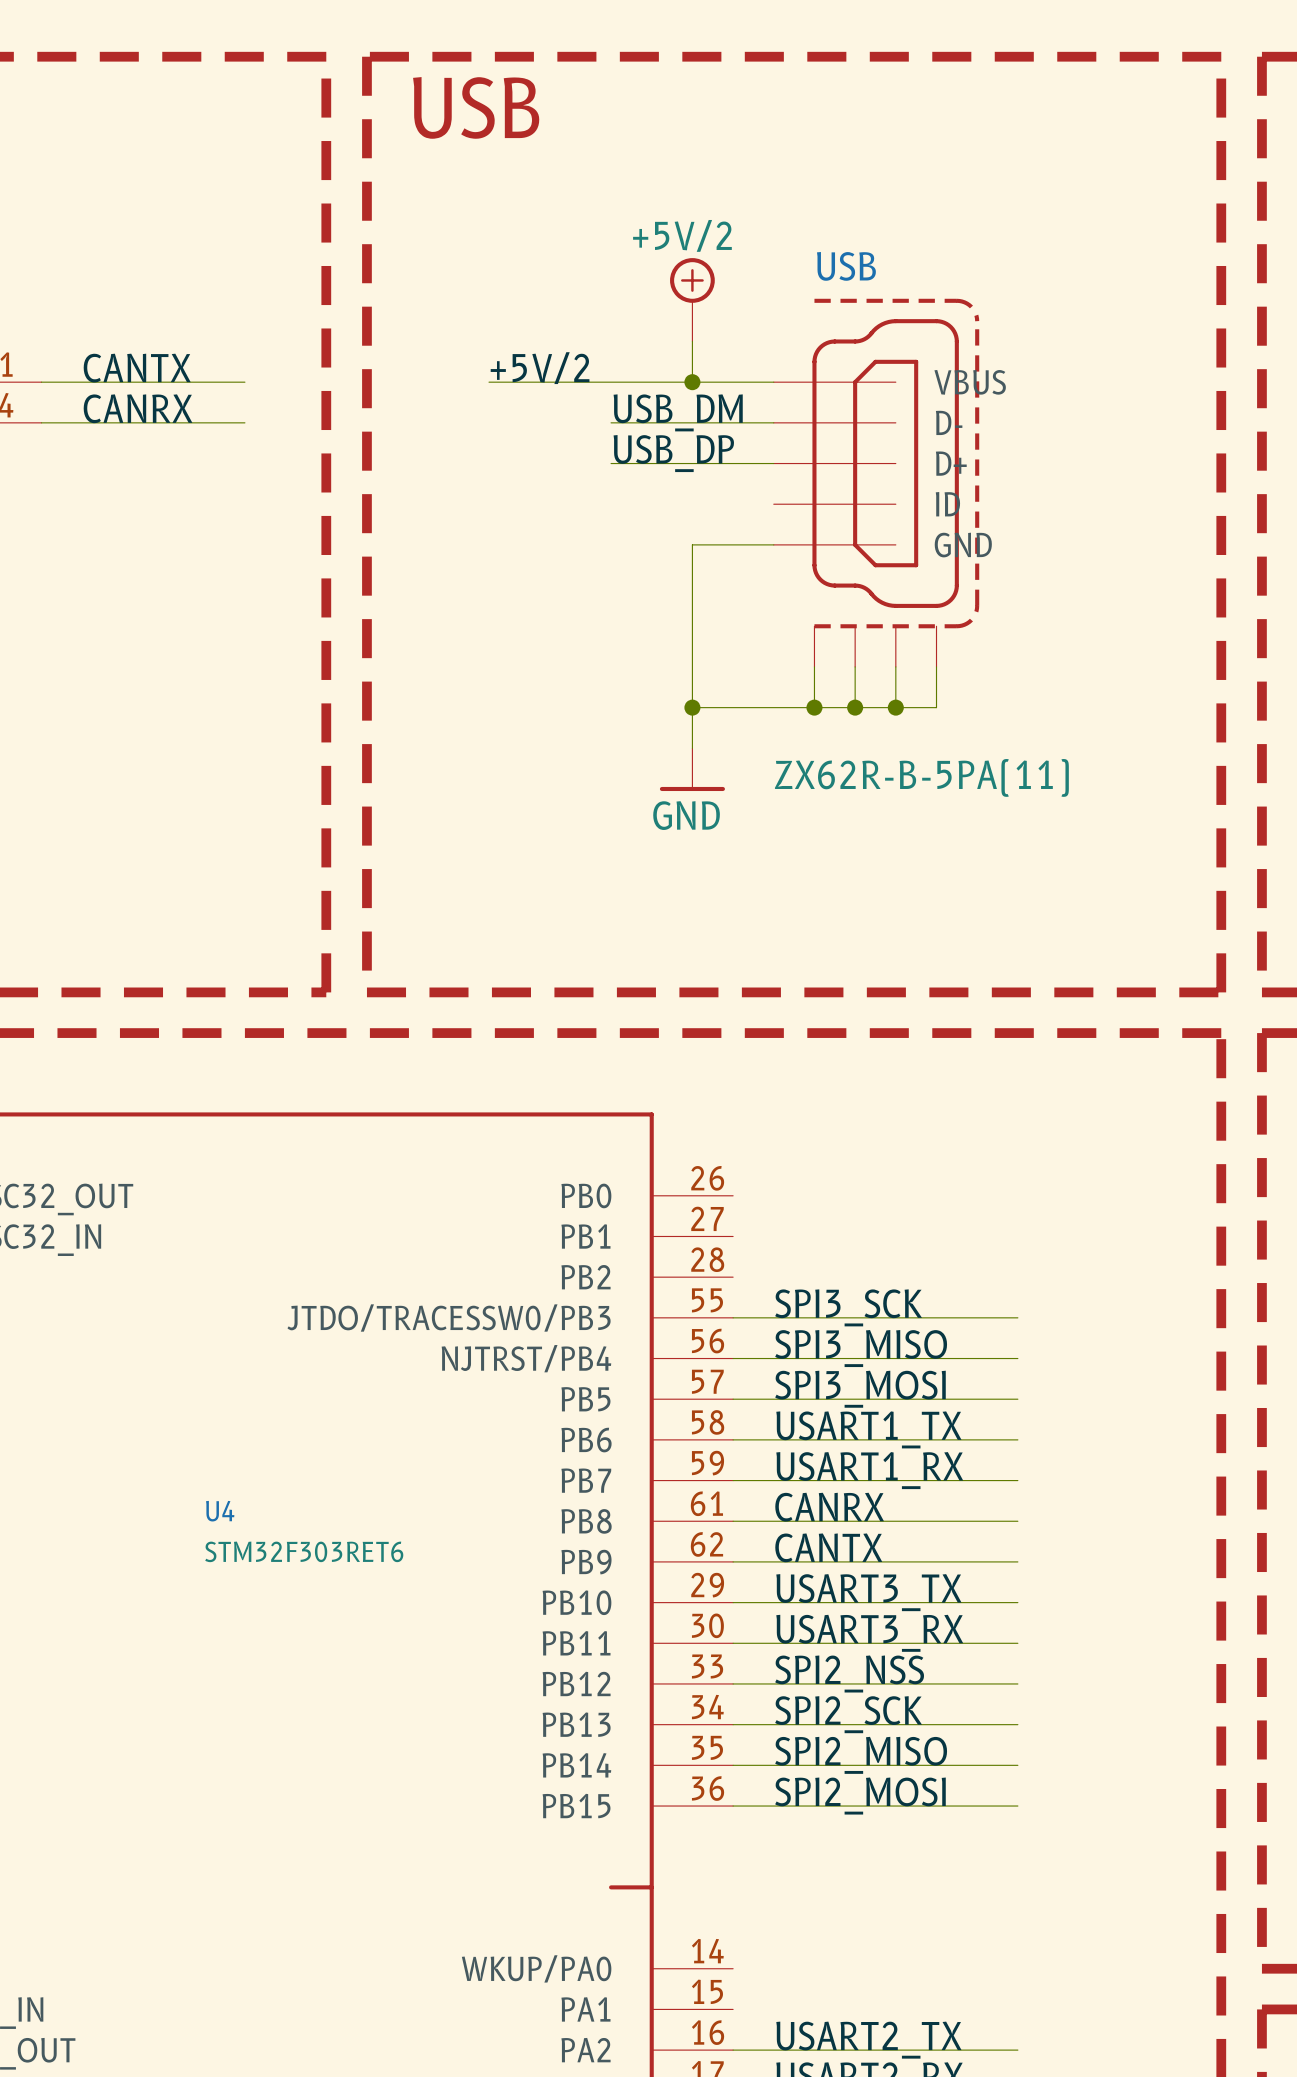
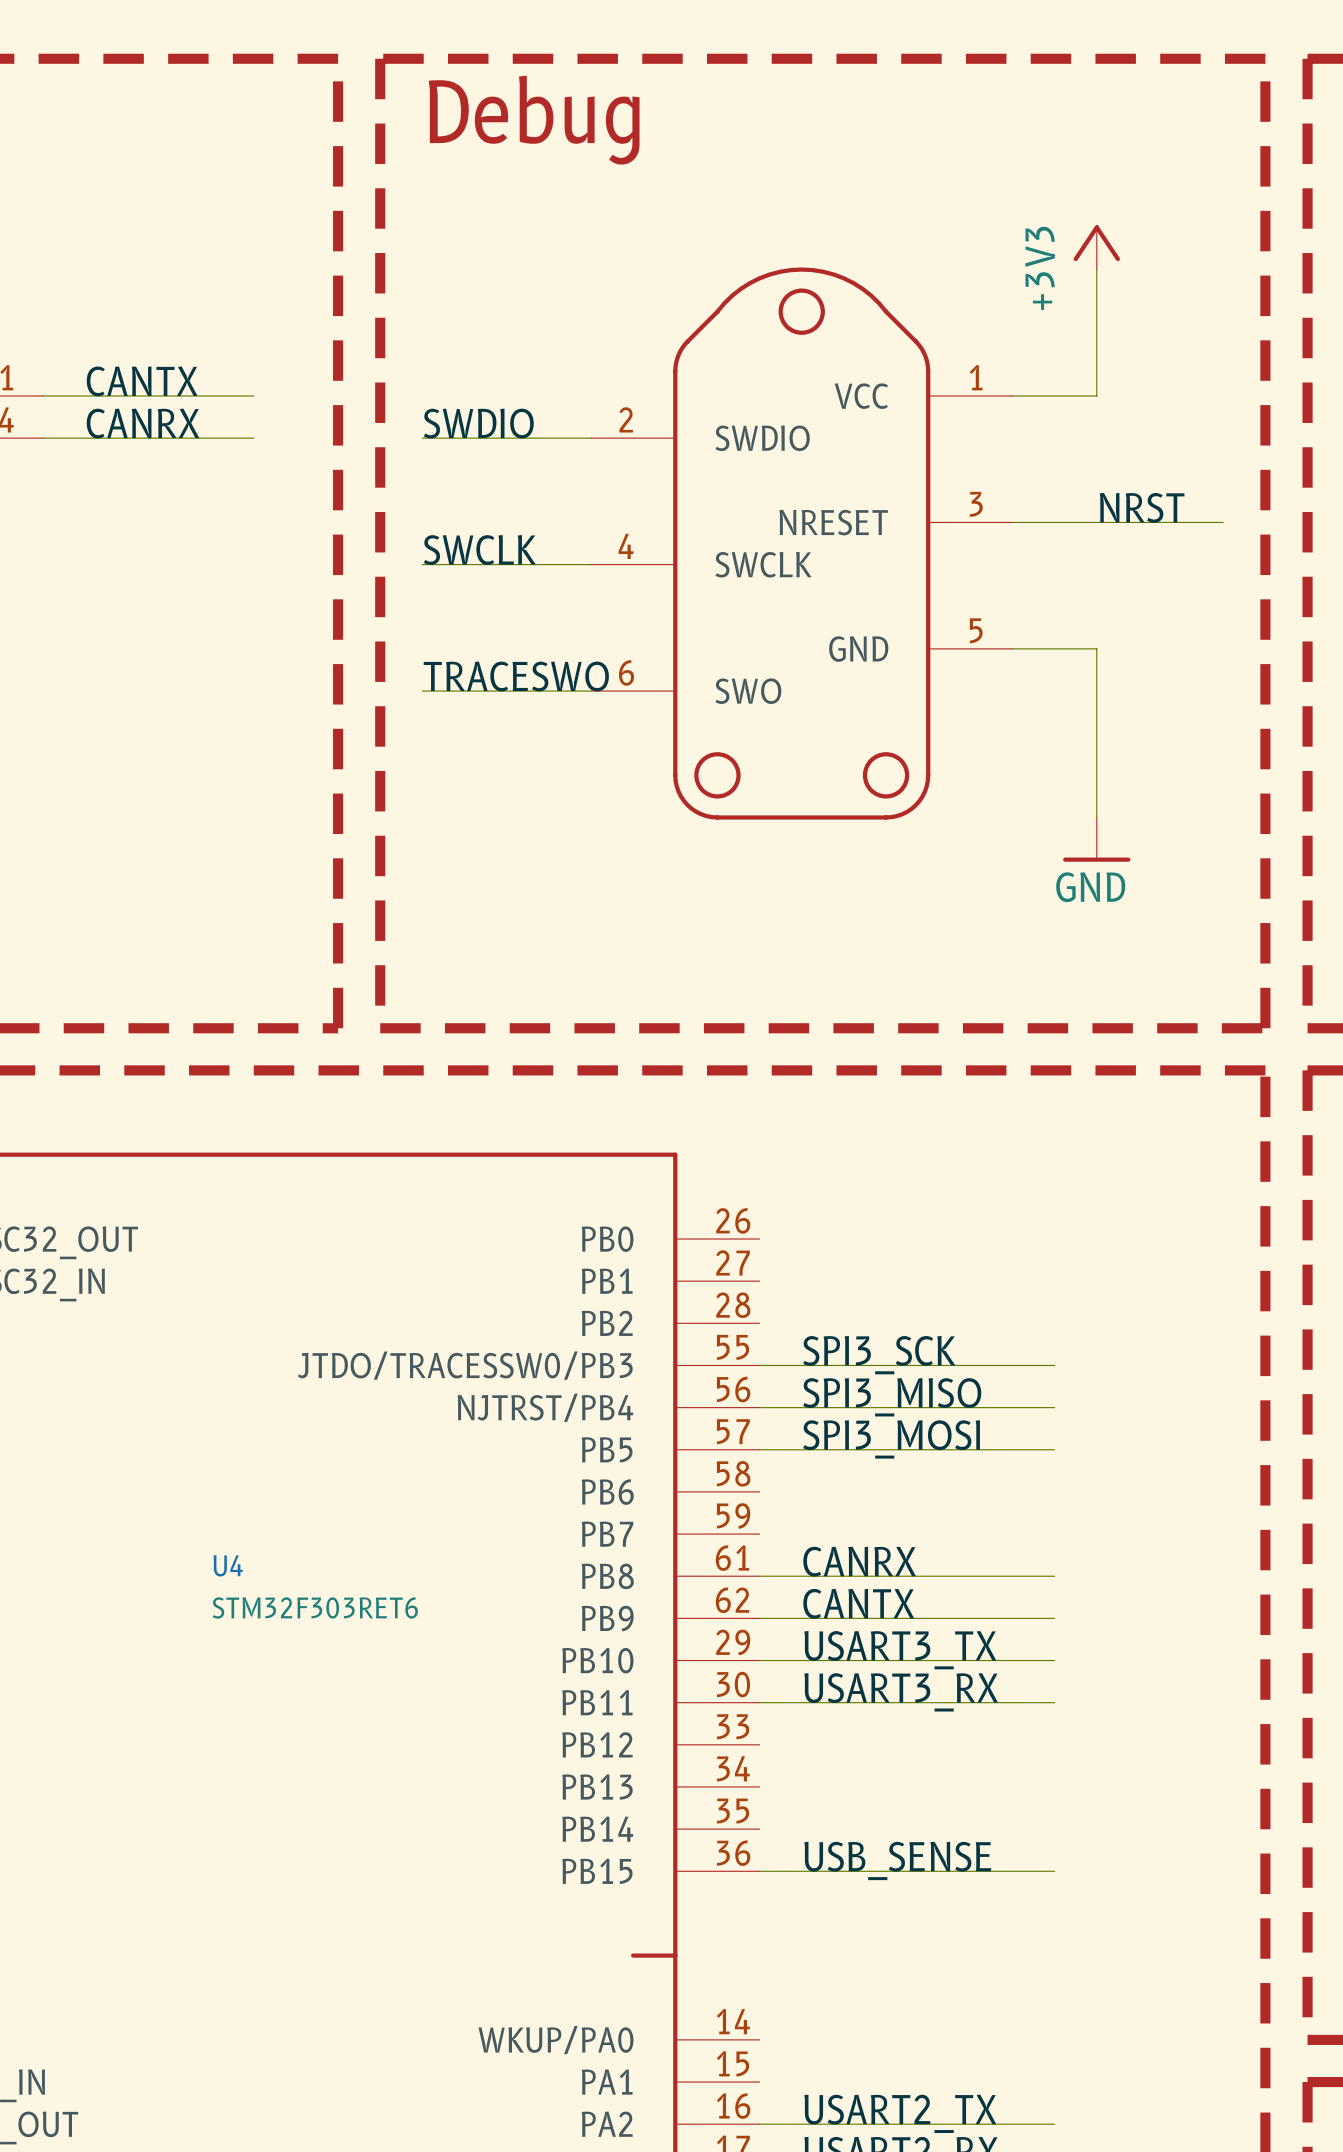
text: USB (476, 107) -> Debug (534, 120)
power symbol: none -> +3V3 (1096, 247)
wire: none -> (1096, 269) (1096, 395) (1012, 395)
power symbol: +5V/2 (692, 299) -> none
wire: (692, 341) (692, 382) -> none
label: +5V/2 (540, 368) -> none
wire: (489, 382) (773, 382) -> none
junction: (692, 382) -> none
label: none -> SWDIO (478, 423)
label: USB_DM (678, 412) -> none
wire: (611, 422) (773, 422) -> (422, 438) (590, 438)
label: USB_DP (673, 453) -> none
wire: (611, 463) (773, 463) -> (422, 564) (590, 564)
USB: ZX62R-B-5PA(11) (866, 463) -> none
part: (895, 482) -> none
label: none -> NRST (1142, 507)
wire: none -> (1012, 522) (1223, 522)
part: none -> (801, 543)
label: none -> SWCLK (479, 550)
wire: (773, 544) (692, 544) (692, 748) -> none
wire: none -> (1012, 648) (1096, 648) (1096, 817)
label: none -> TRACESWO (516, 676)
wire: none -> (422, 691) (590, 691)
wire: (814, 666) (814, 707) -> none
wire: (855, 666) (855, 707) -> none
wire: (936, 666) (936, 707) (692, 707) -> none
junction: (692, 707) -> none
junction: (814, 707) -> none
junction: (855, 707) -> none
junction: (895, 707) -> none
power symbol position: GND (692, 769) -> GND (1096, 839)
label: USART1_TX (868, 1429) -> none
wire: (733, 1439) (1017, 1439) -> none
label: USART1_RX (869, 1470) -> none
wire: (733, 1480) (1017, 1480) -> none
label: SPI2_NSS (849, 1674) -> none
wire: (733, 1683) (1017, 1683) -> none
label: SPI2_SCK (848, 1714) -> none
wire: (733, 1724) (1017, 1724) -> none
label: SPI2_MISO (861, 1755) -> none
wire: (733, 1765) (1017, 1765) -> none
label: SPI2_MOSI (860, 1796) -> USB_SENSE (897, 1860)

